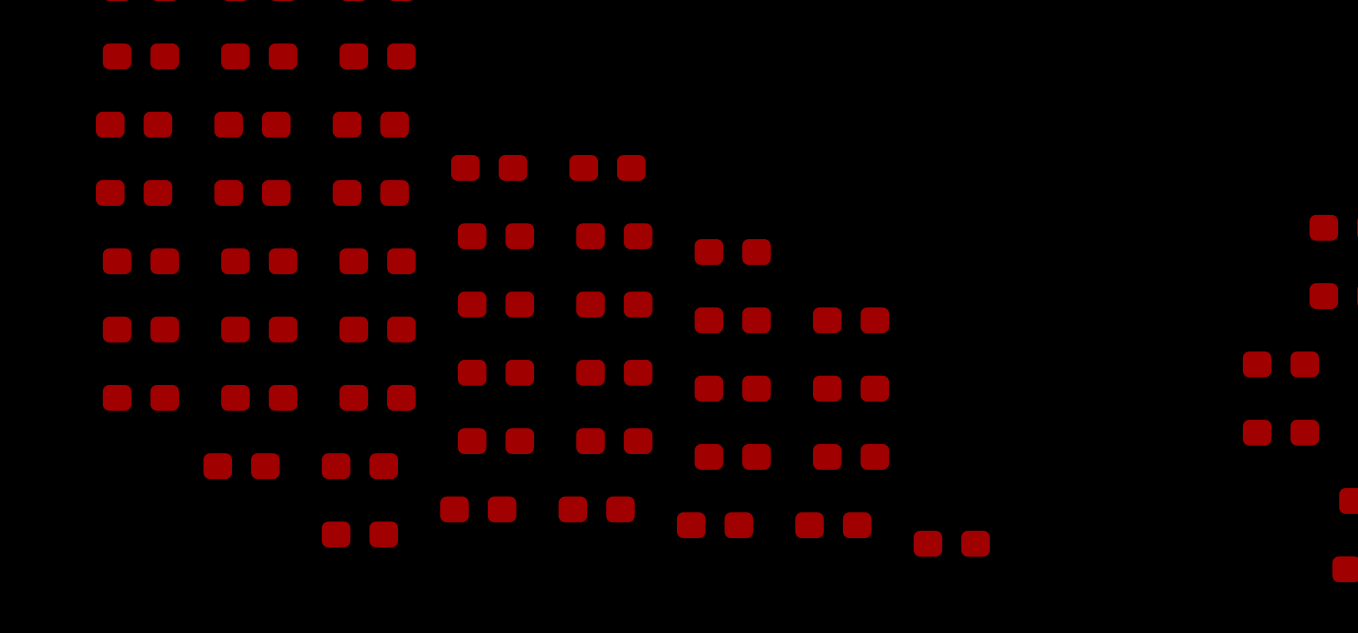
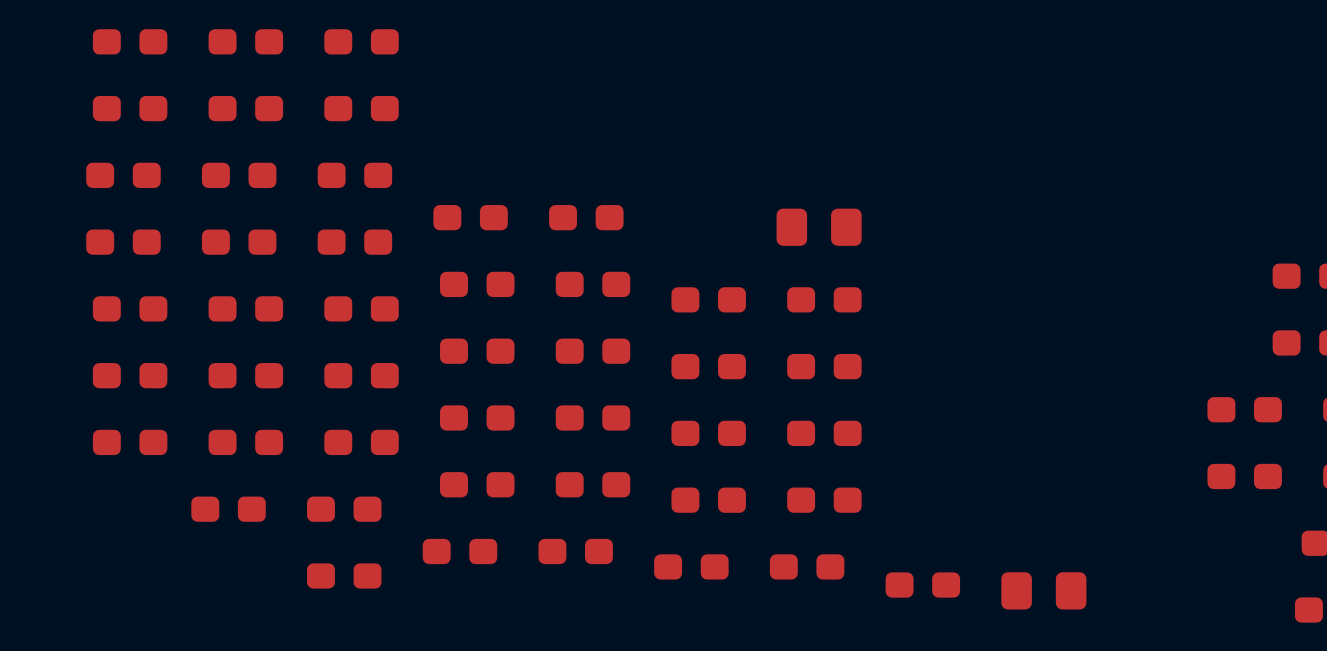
part: none -> (819, 227)
part: none -> (824, 299)
part: none -> (1043, 590)

